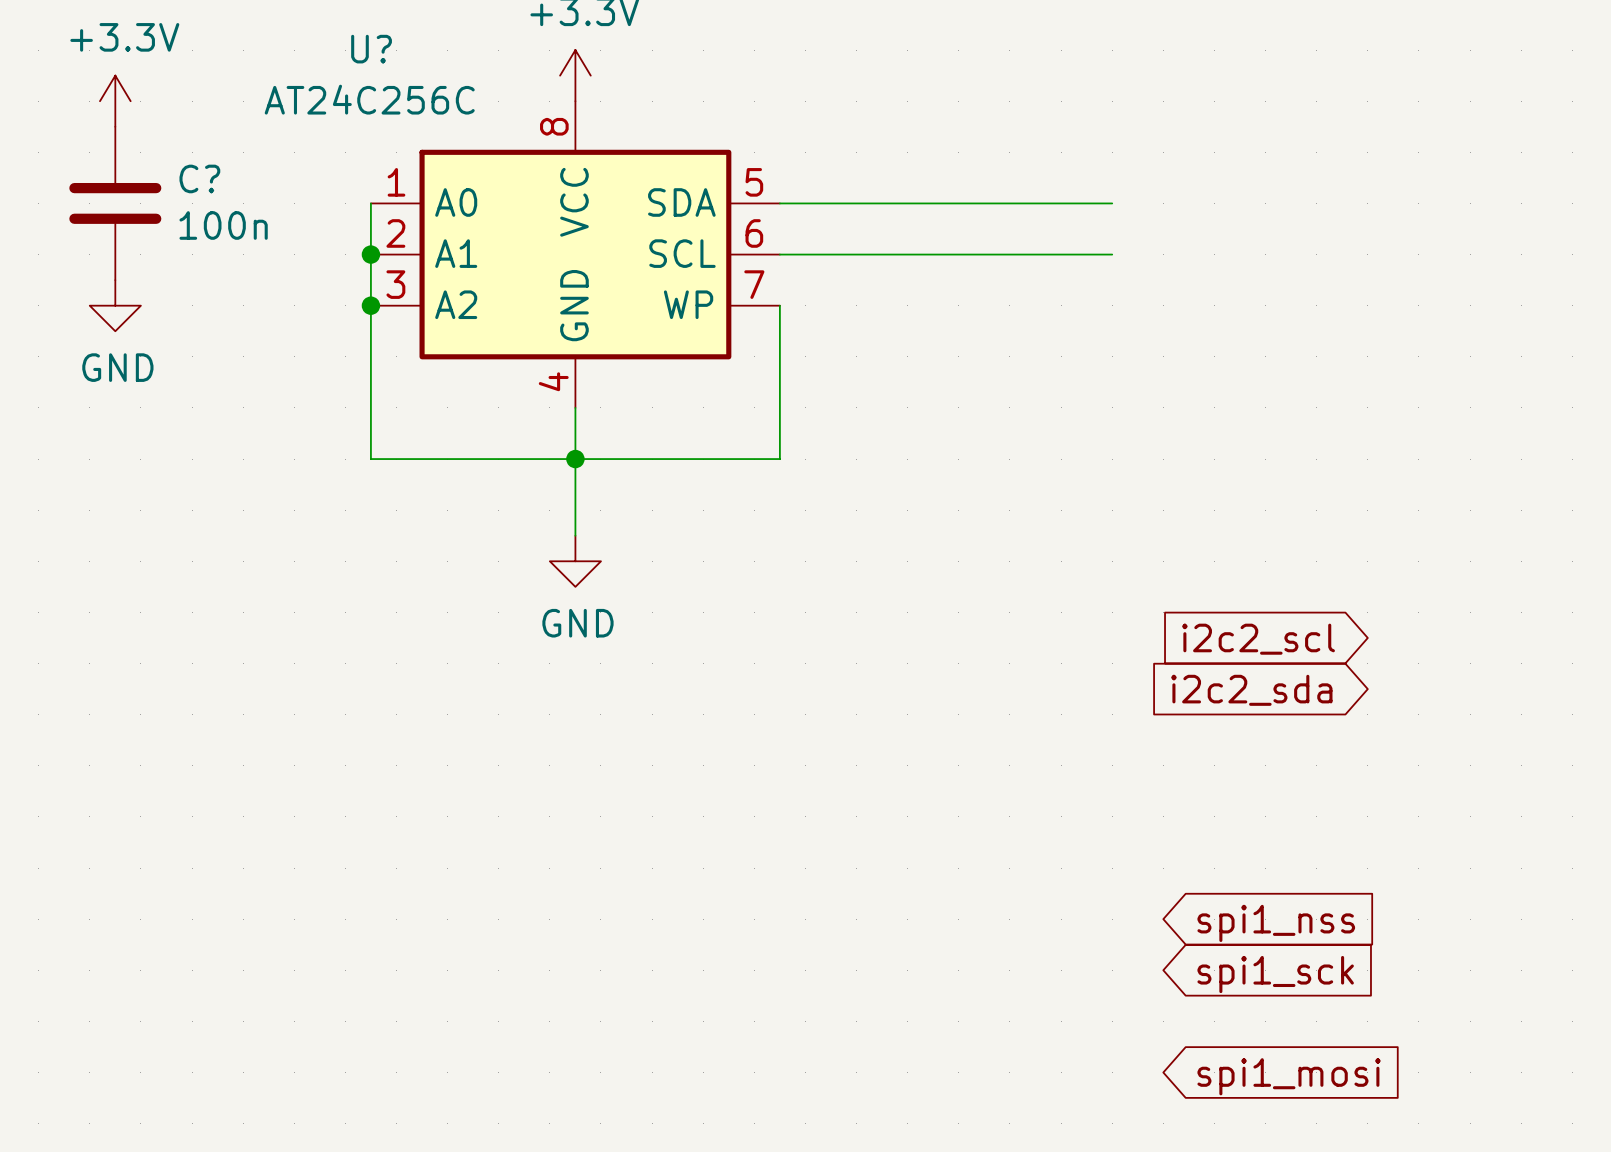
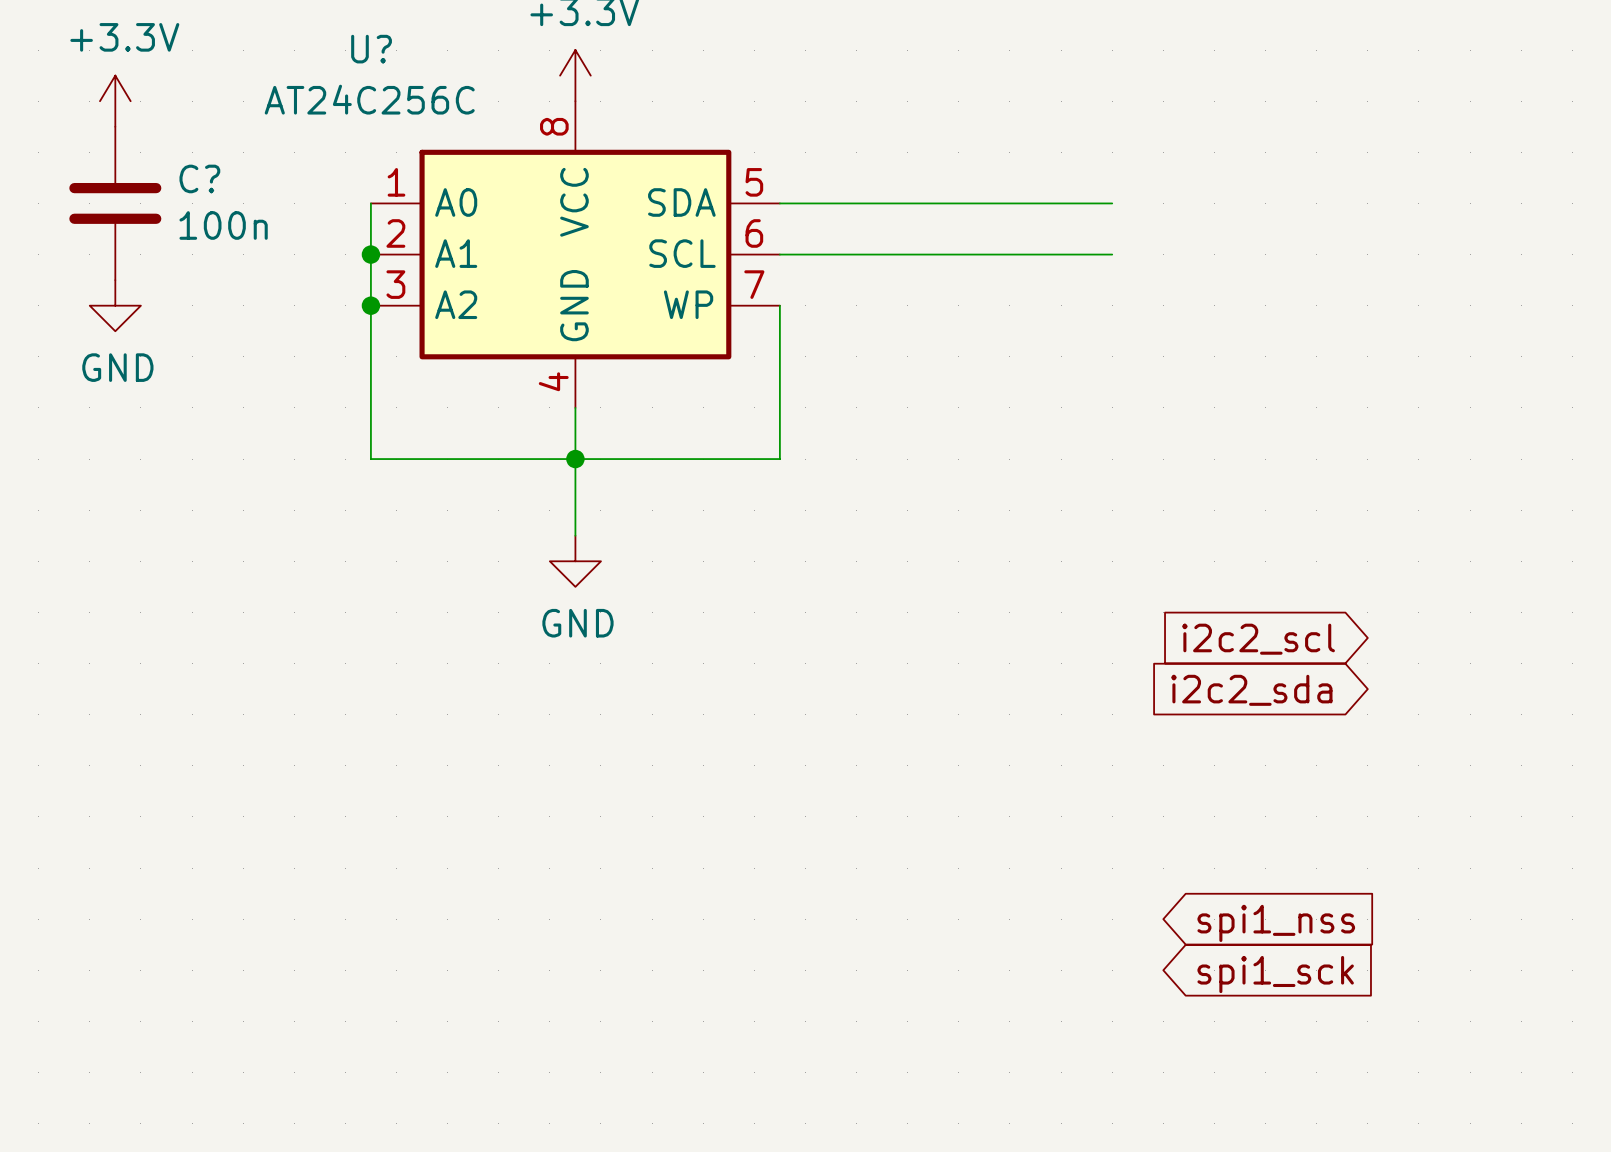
global label: spi1_mosi (1289, 1076) -> none

